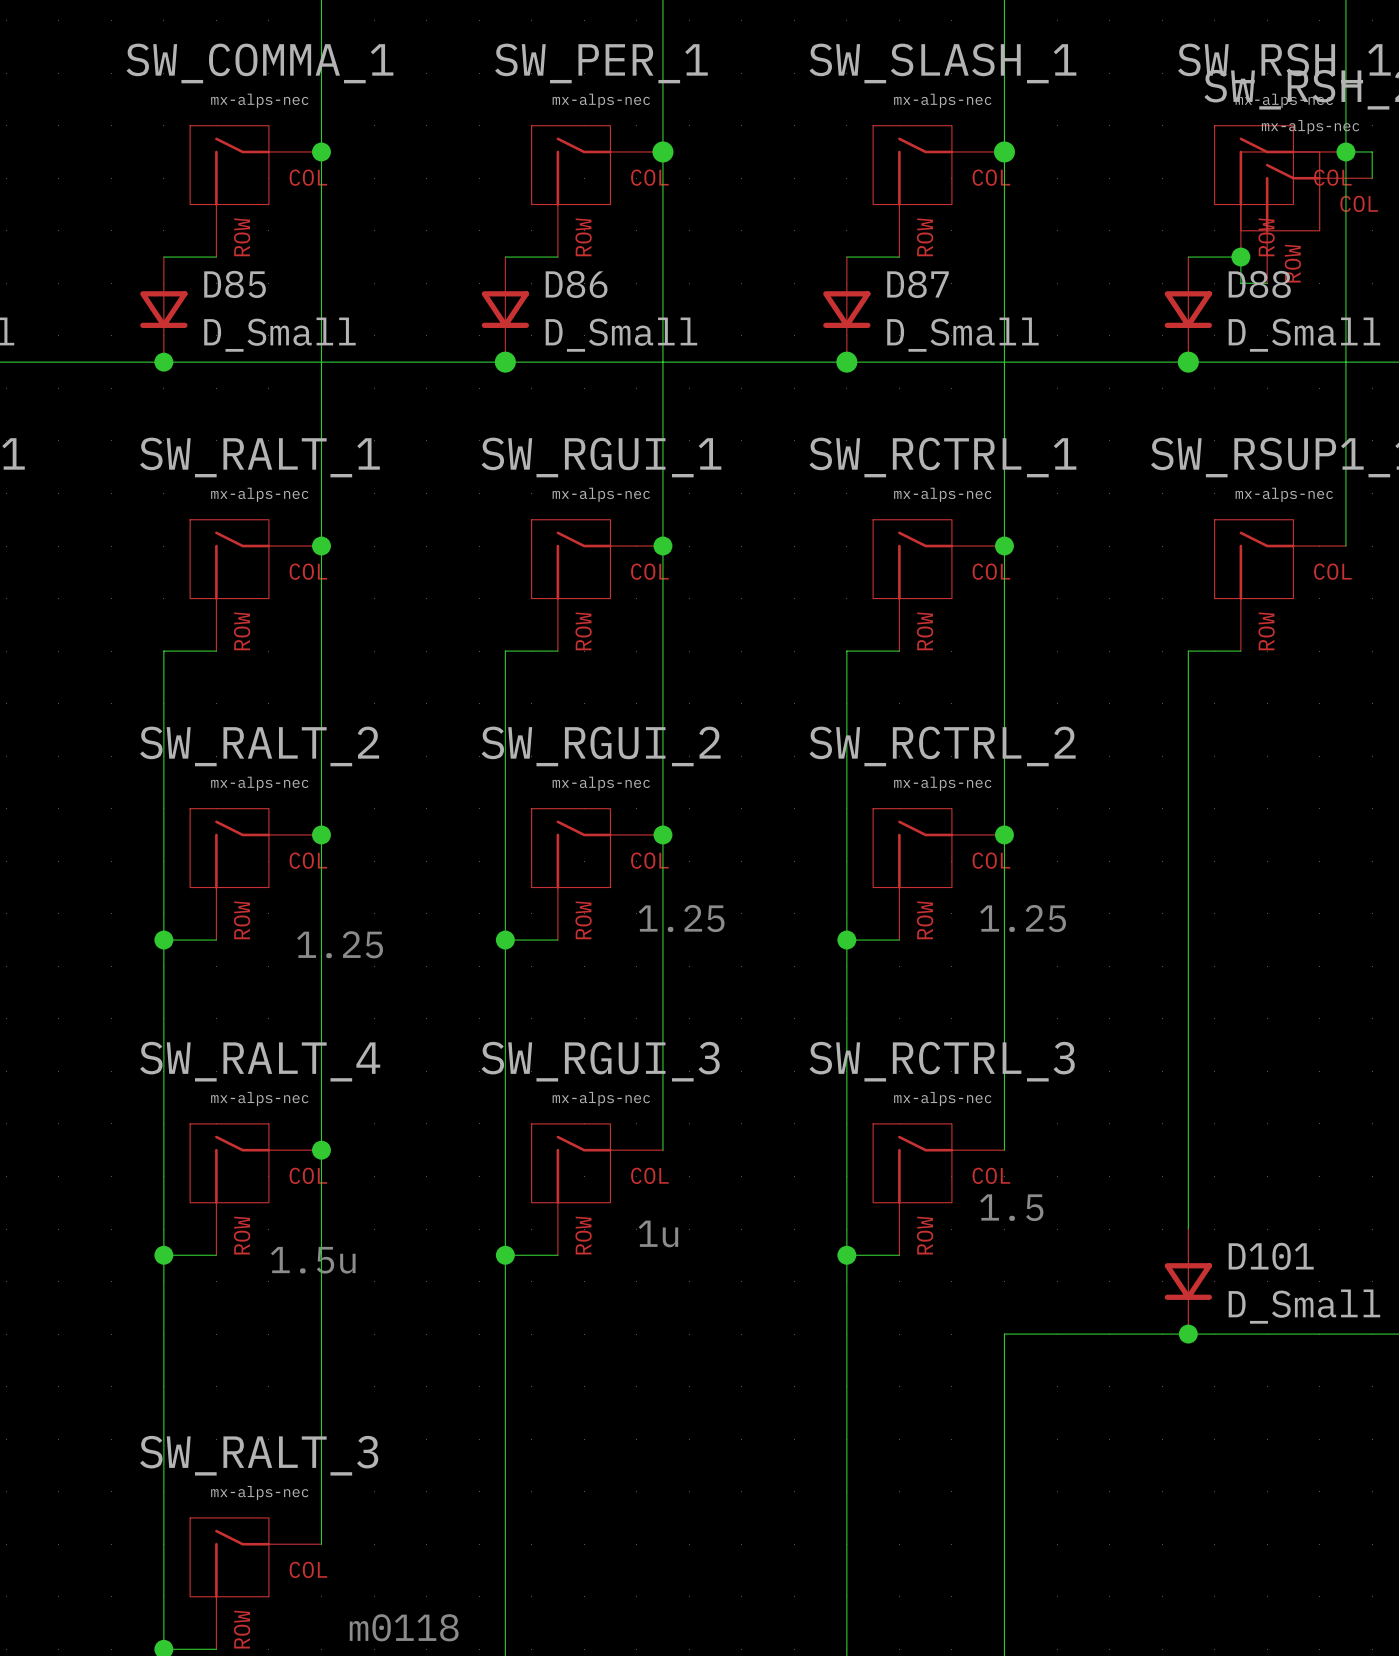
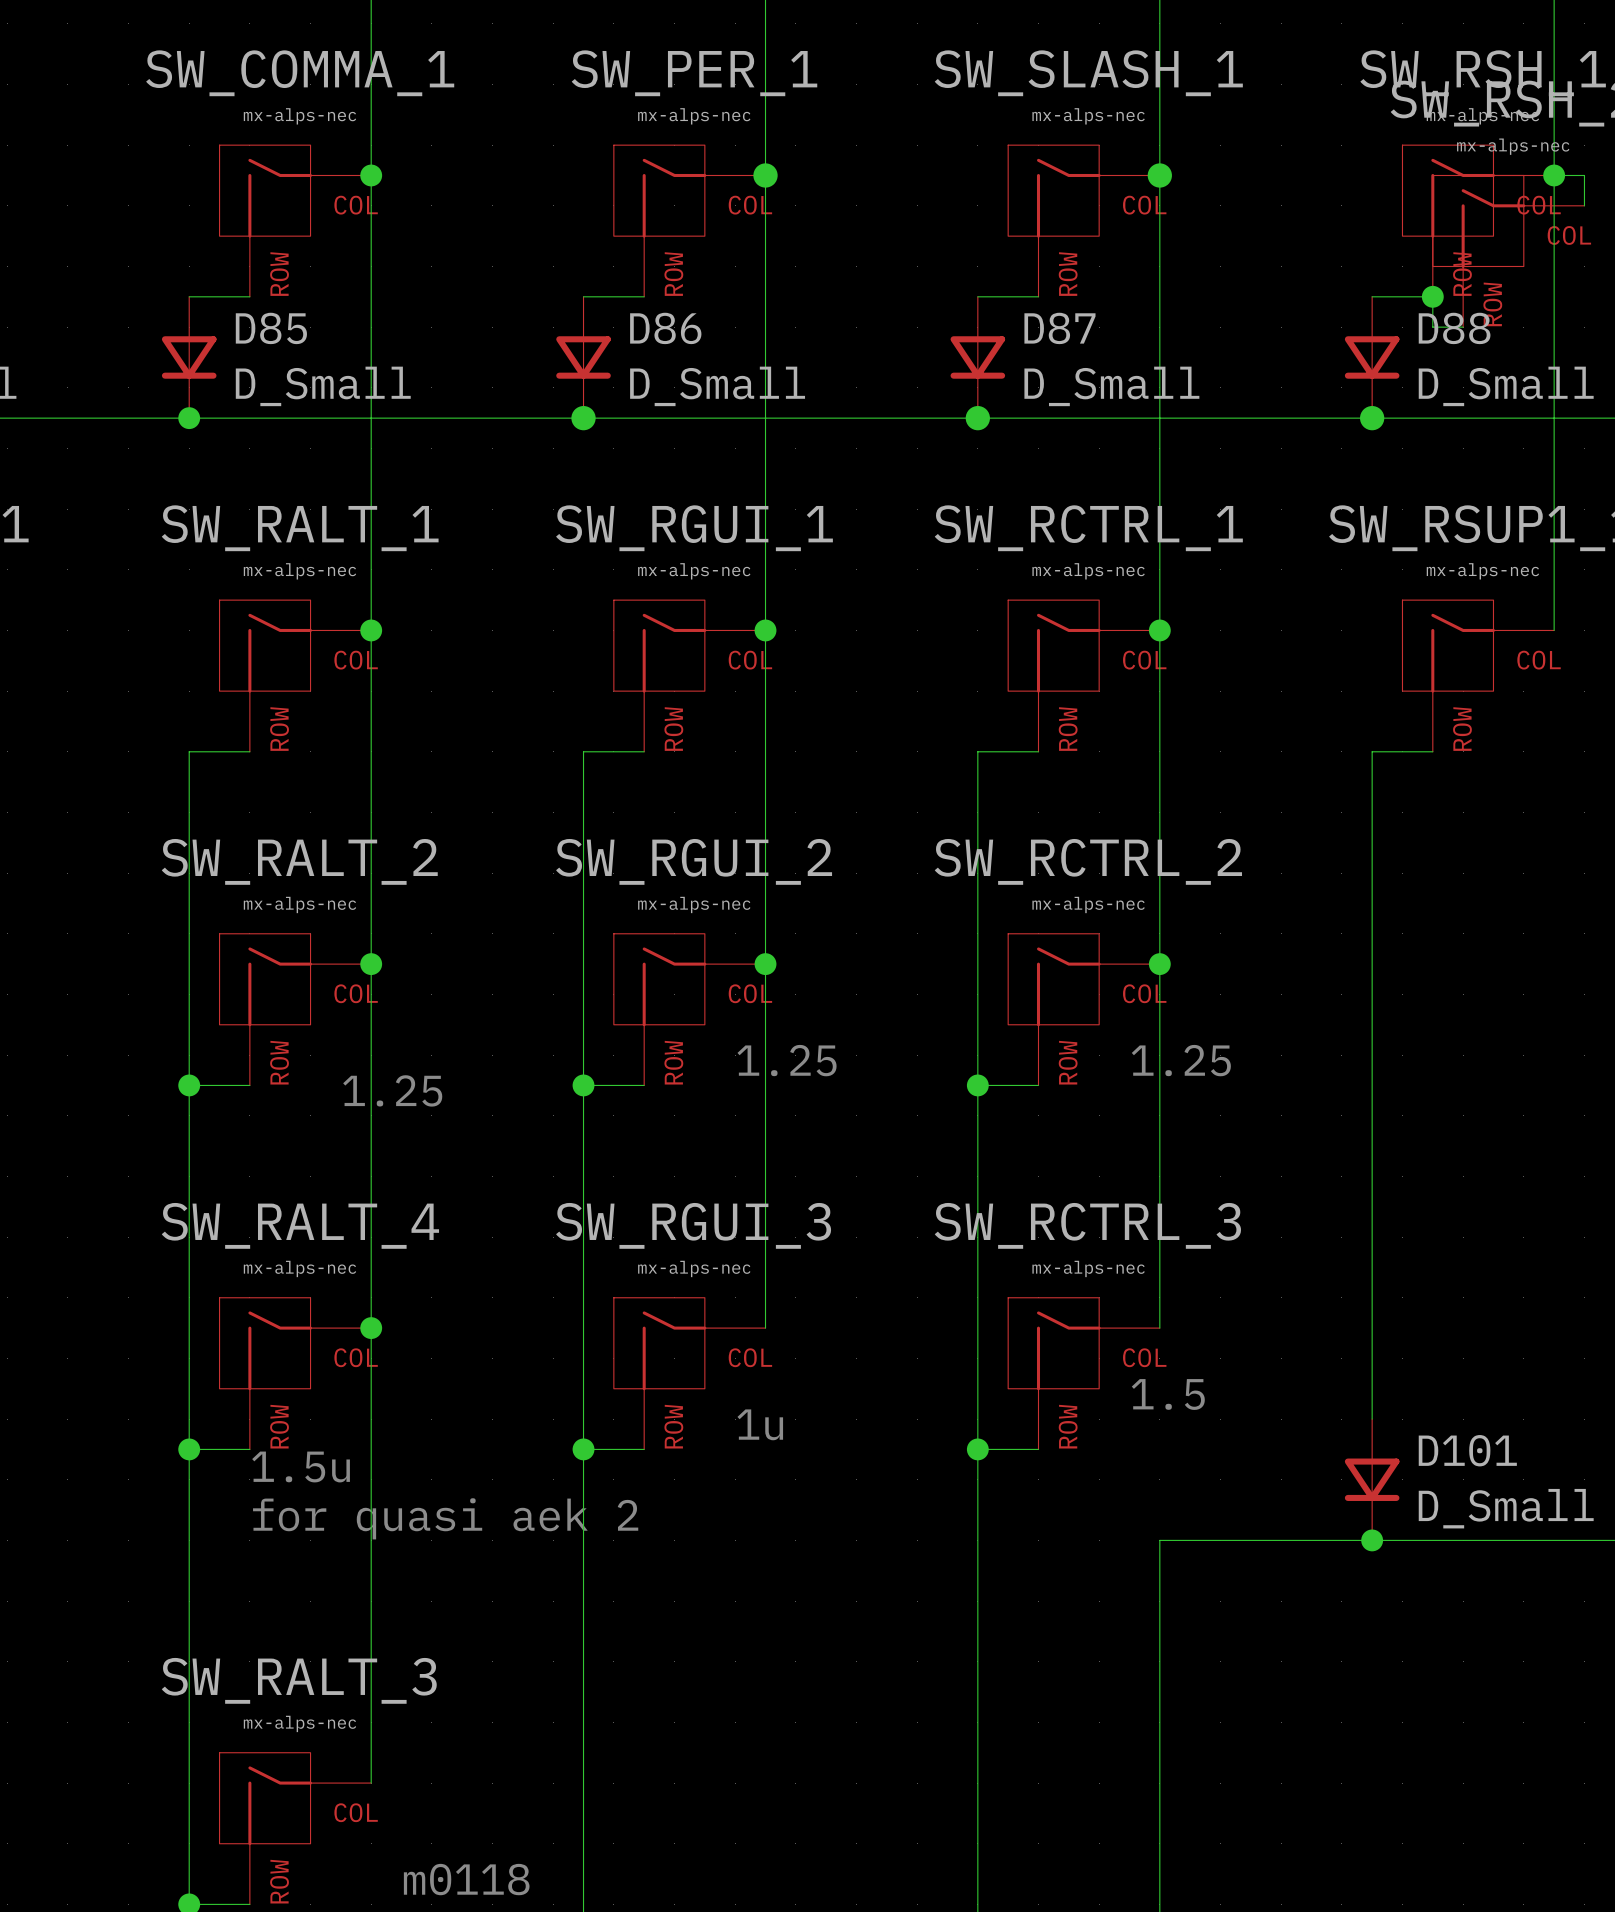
text position: 1.5u (313, 1260) -> 1.5u (301, 1466)
text: none -> for quasi aek 2 (445, 1518)

